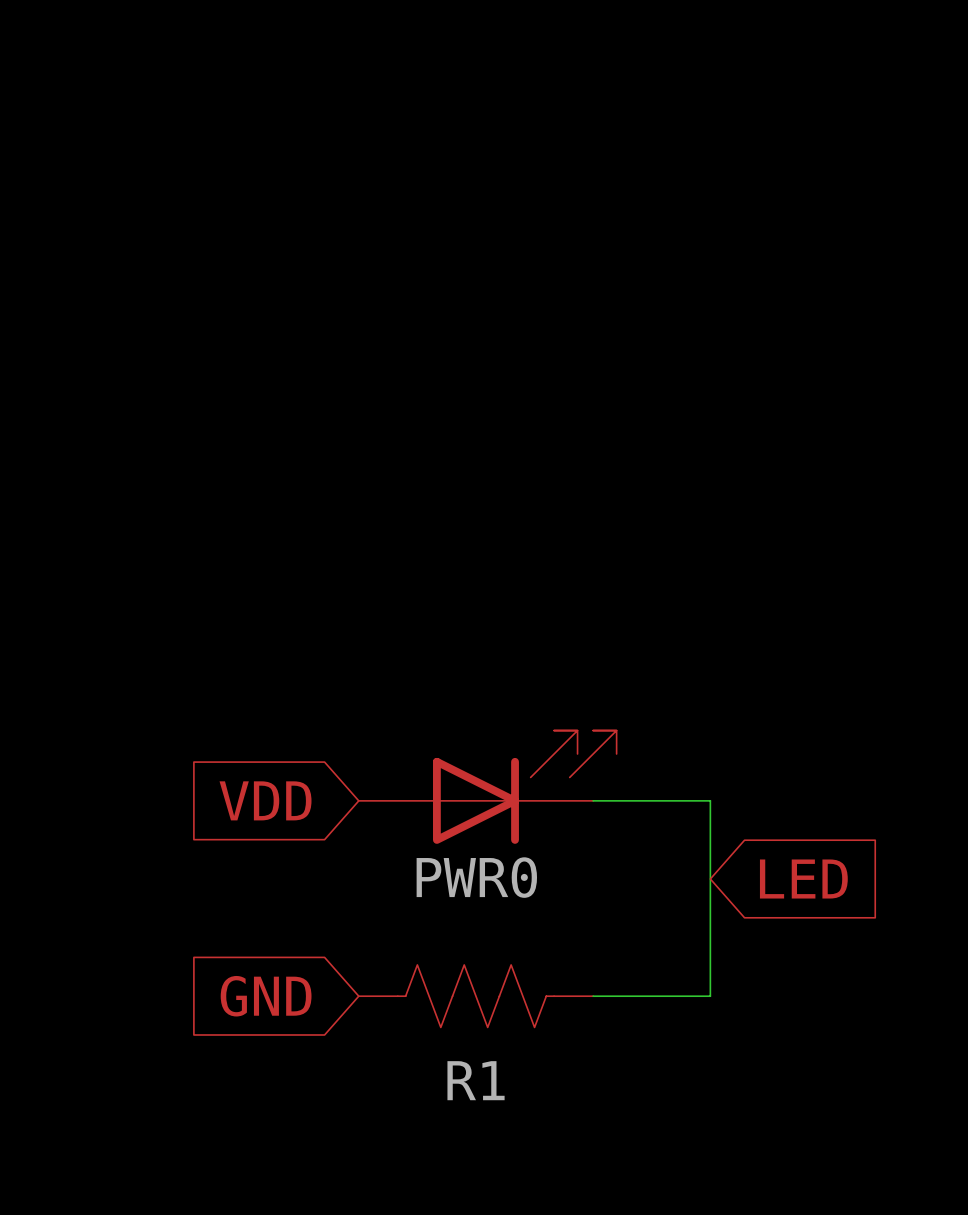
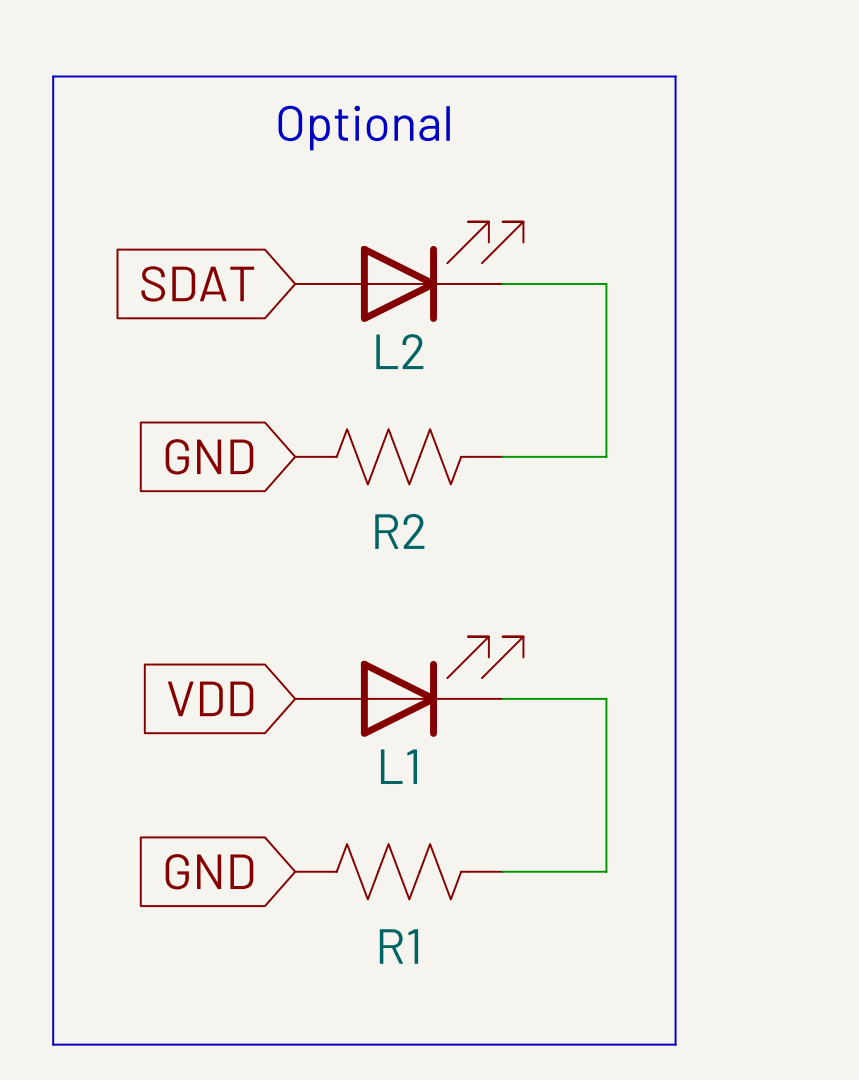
line: none -> (53, 76) (675, 76) (675, 1044) (53, 1044) (53, 76)
text: none -> Optional (364, 127)
L2: none -> (409, 271)
global label: none -> SDAT (197, 283)
wire: none -> (502, 283) (606, 283) (606, 456) (502, 456)
global label: none -> GND (209, 456)
R2: none -> (398, 456)
PWR0 name: PWR0 (476, 877) -> L1 (398, 766)
global label: LED (803, 879) -> none

